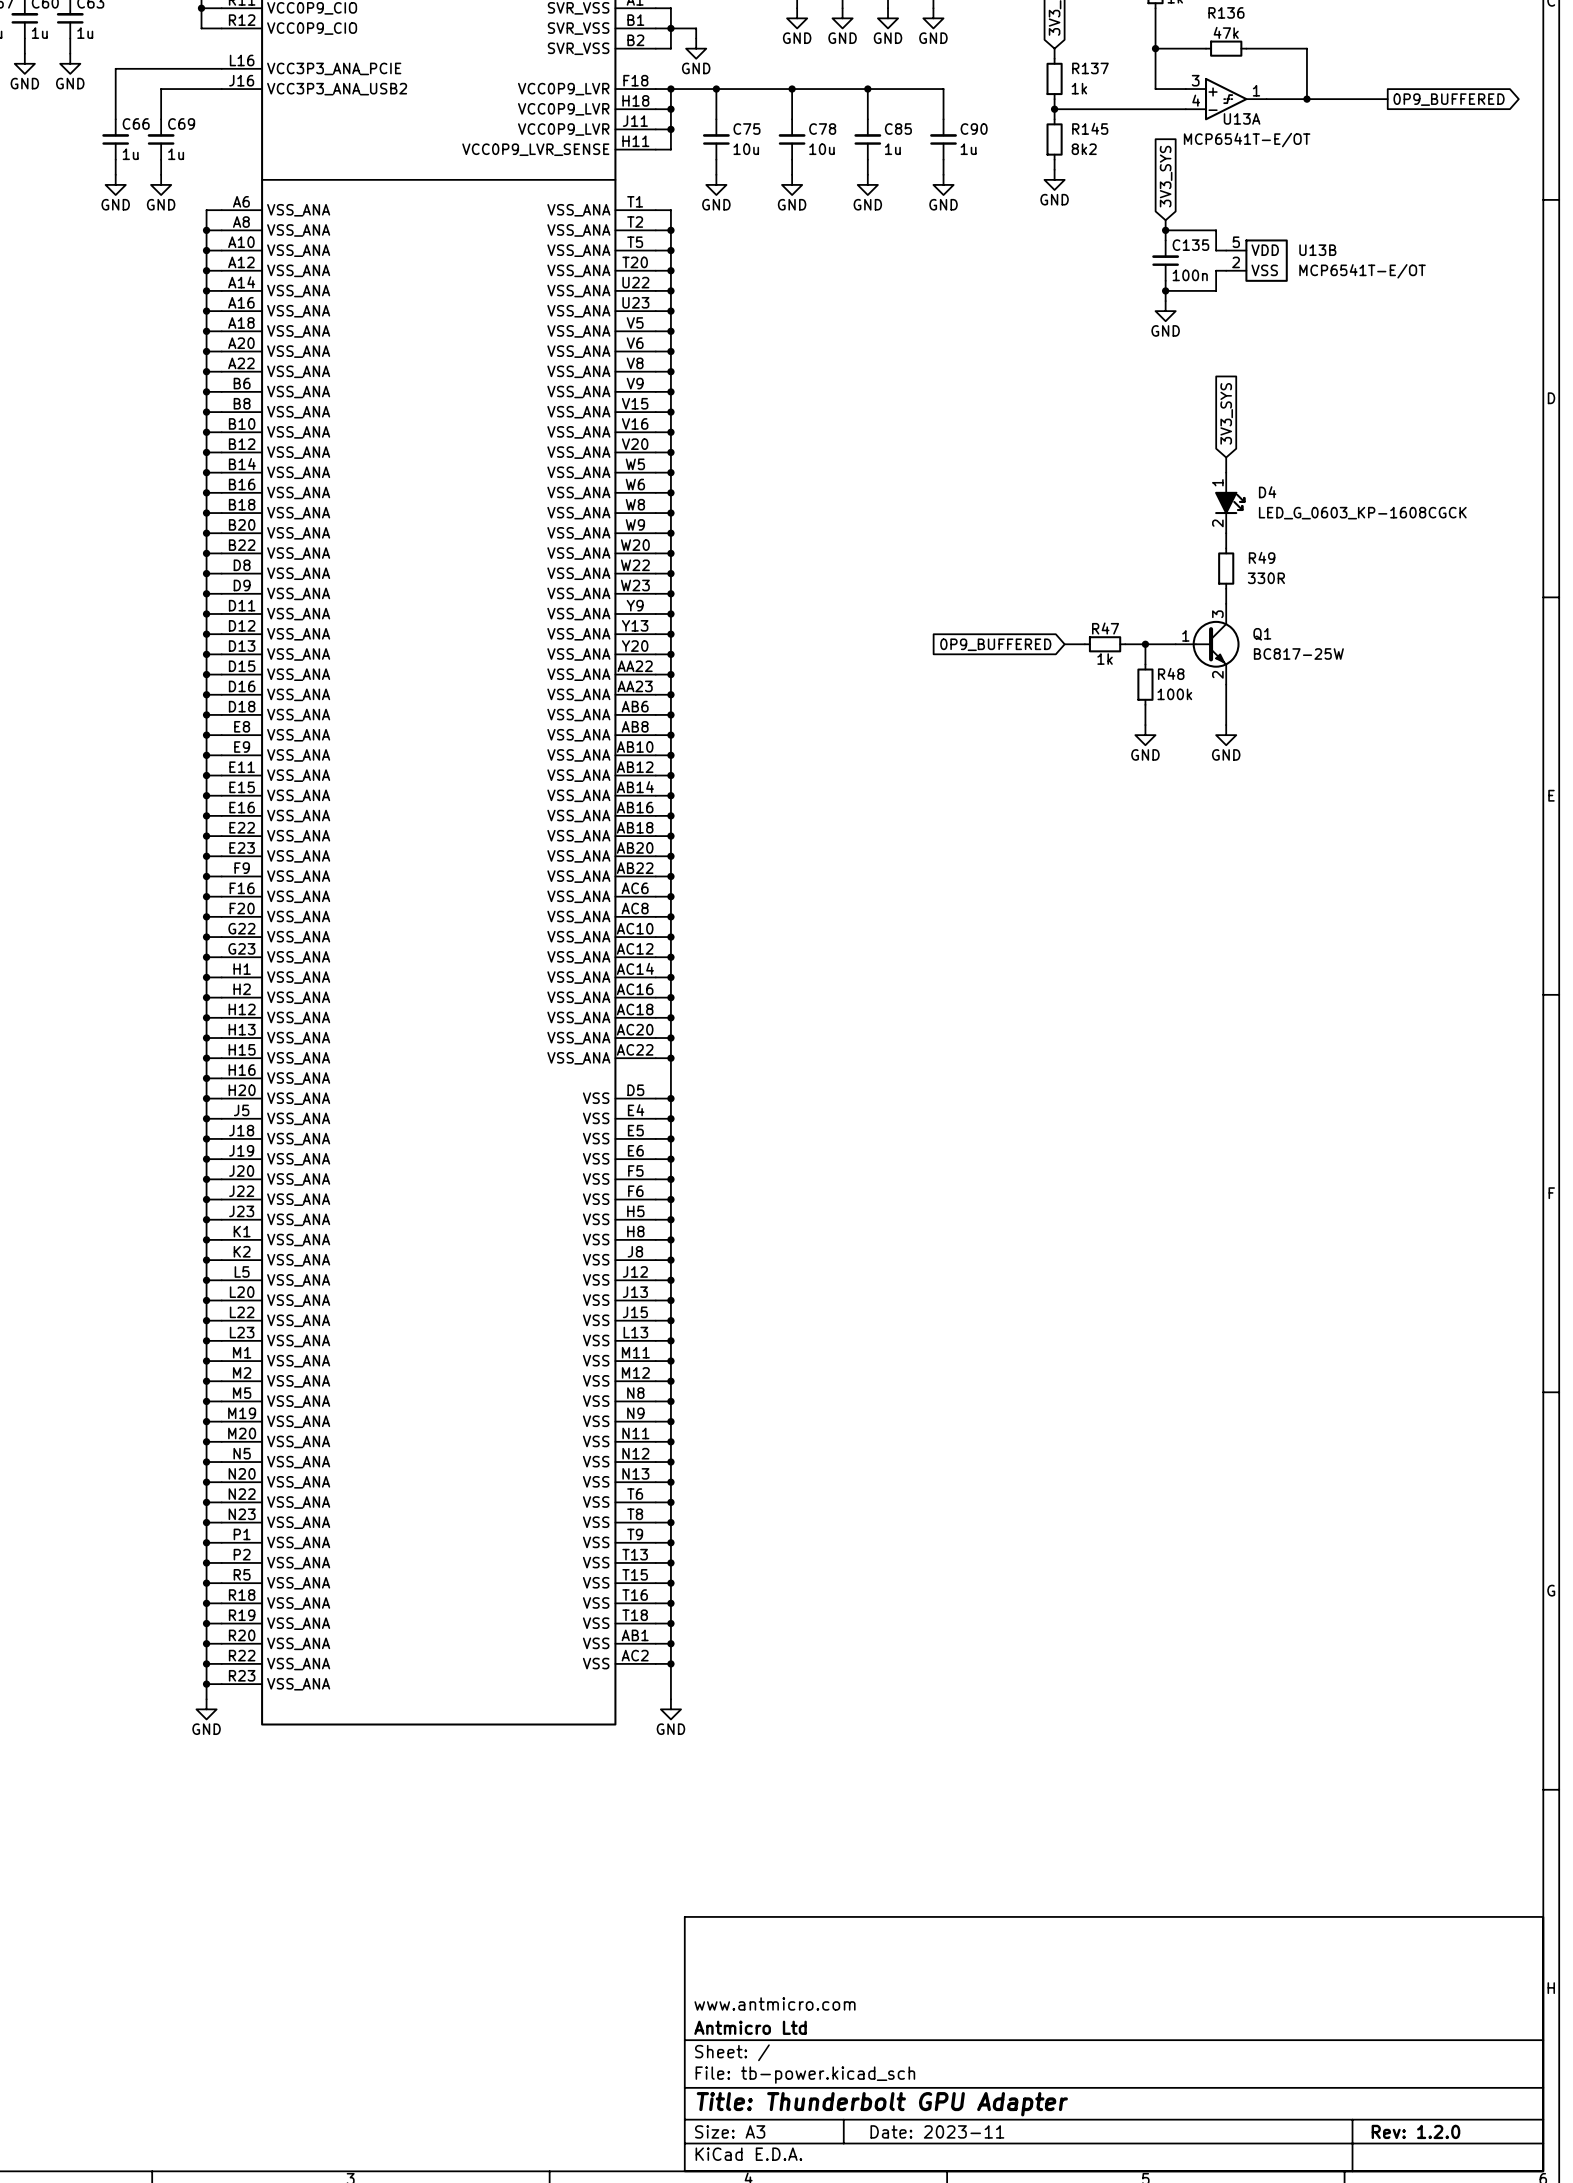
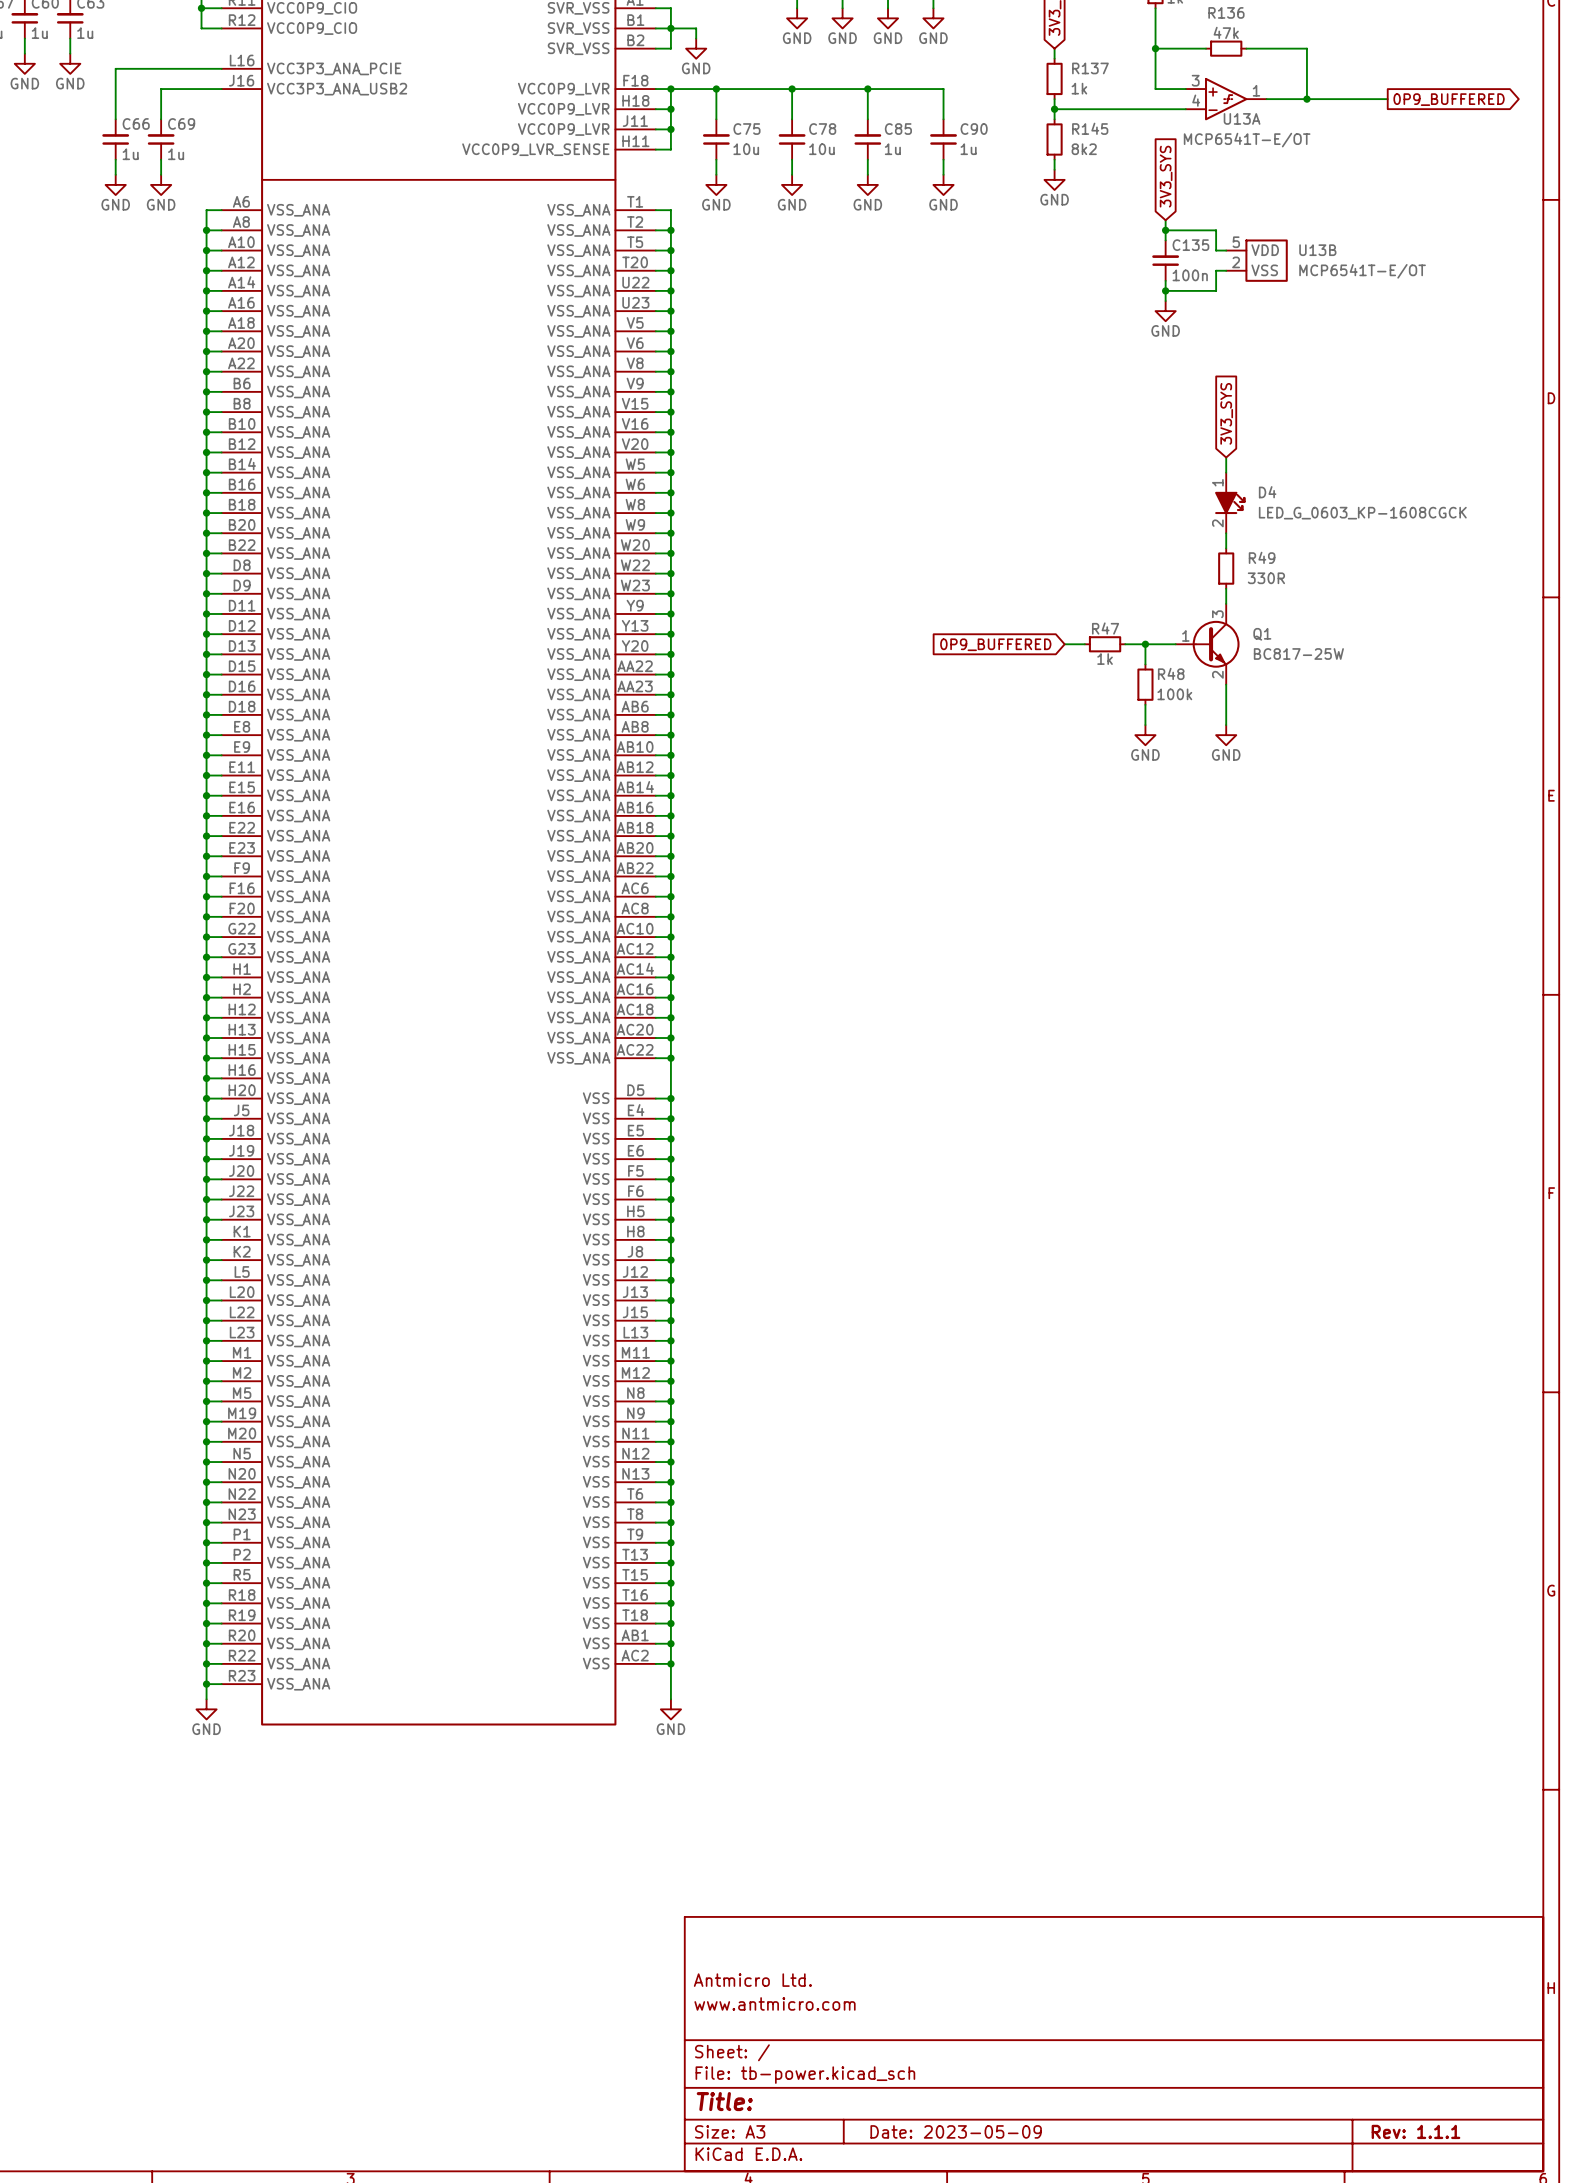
title block: none -> Antmicro Ltd. (752, 1980)
title block: Antmicro Ltd (750, 2027) -> none
title block: Title: Thunderbolt GPU Adapter (882, 2104) -> Title: (724, 2101)
title block: Date: 2023-11 (937, 2131) -> Date: 2023-05-09 (956, 2131)
title block: Rev: 1.2.0 (1415, 2131) -> Rev: 1.1.1 (1415, 2131)

